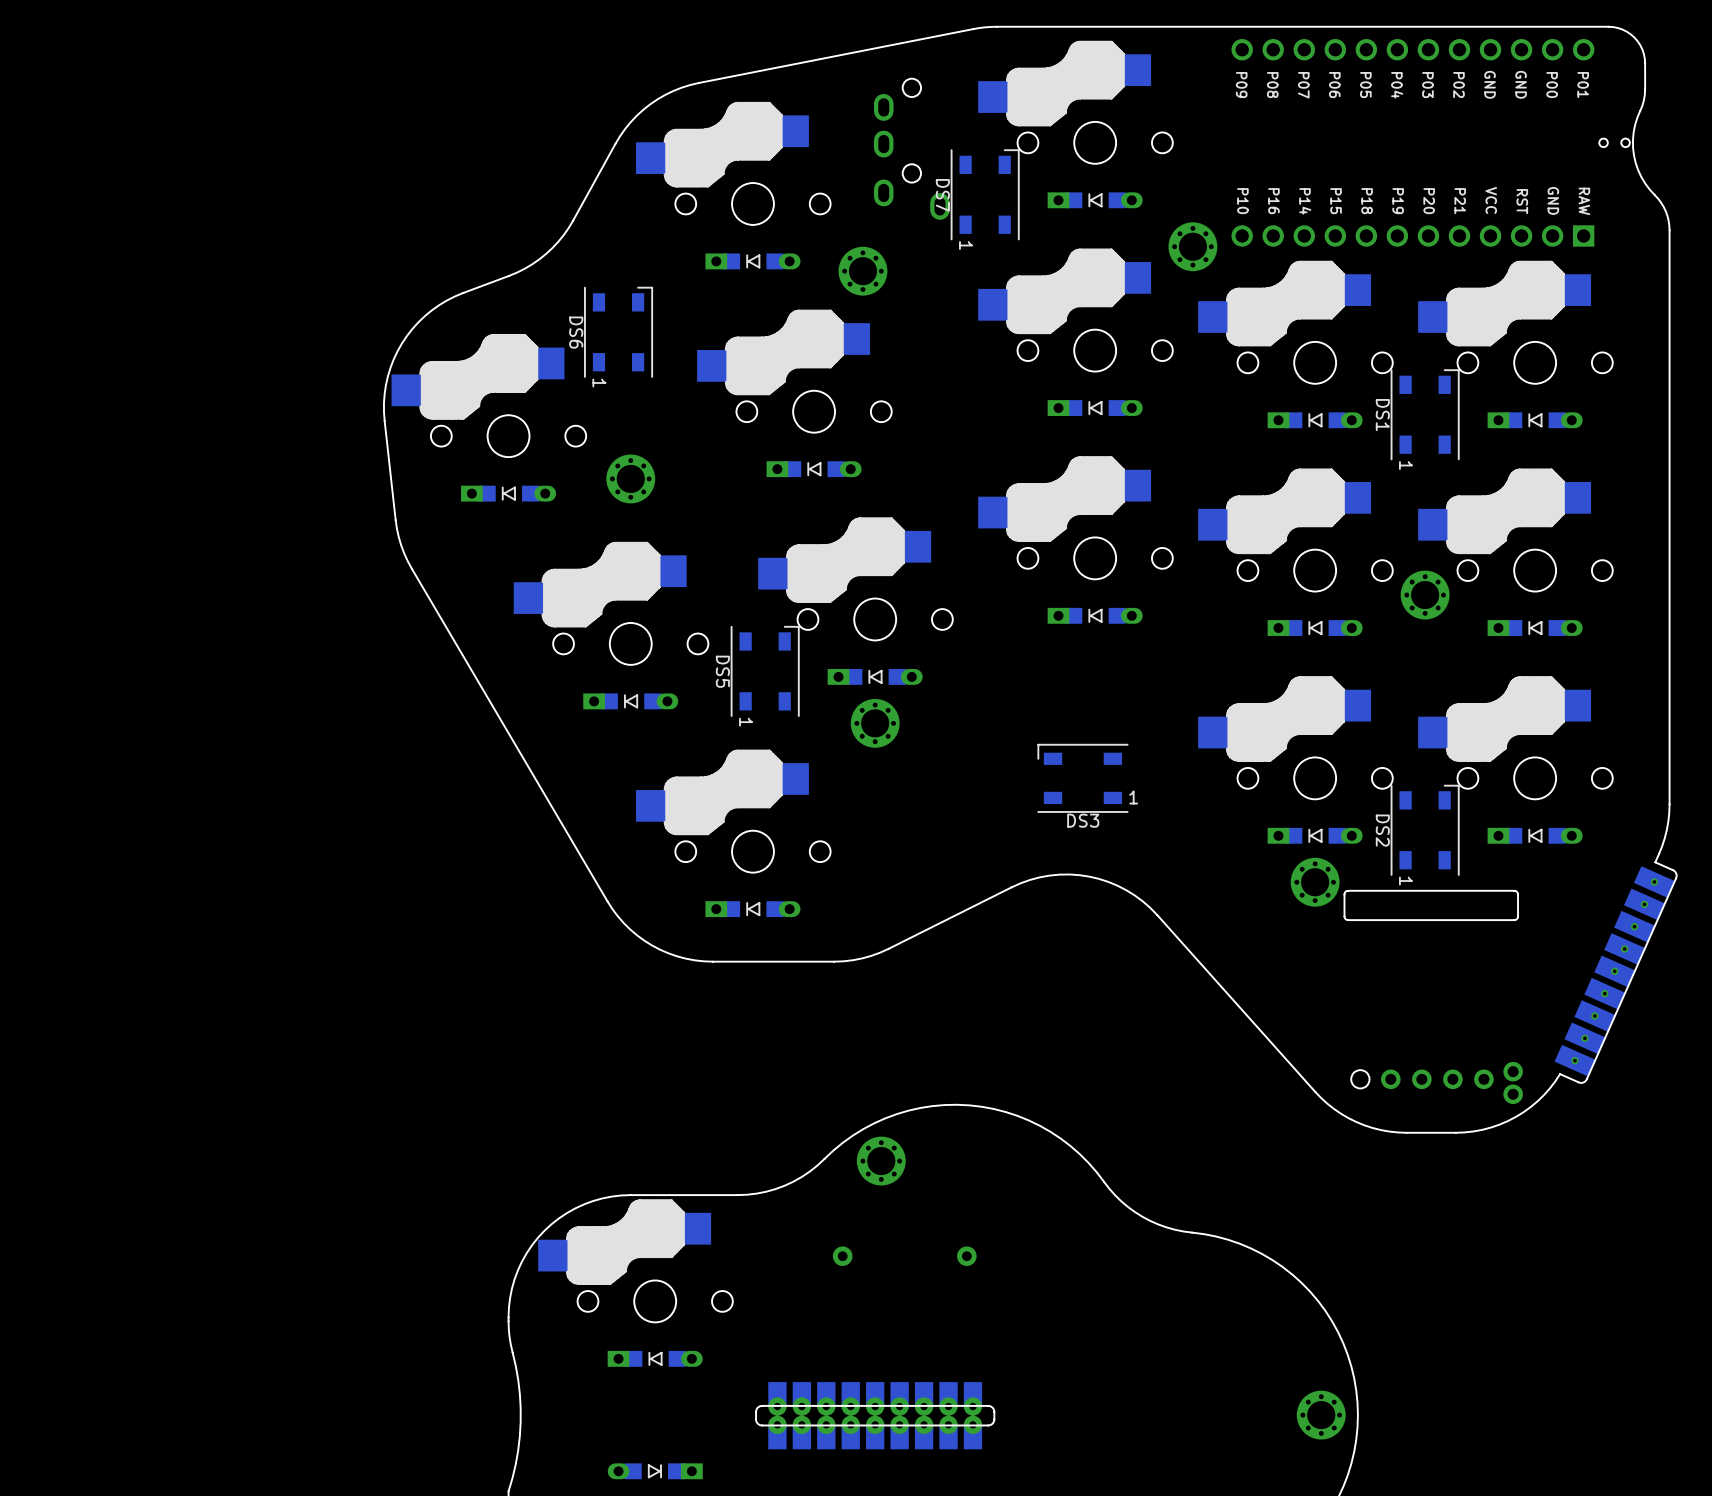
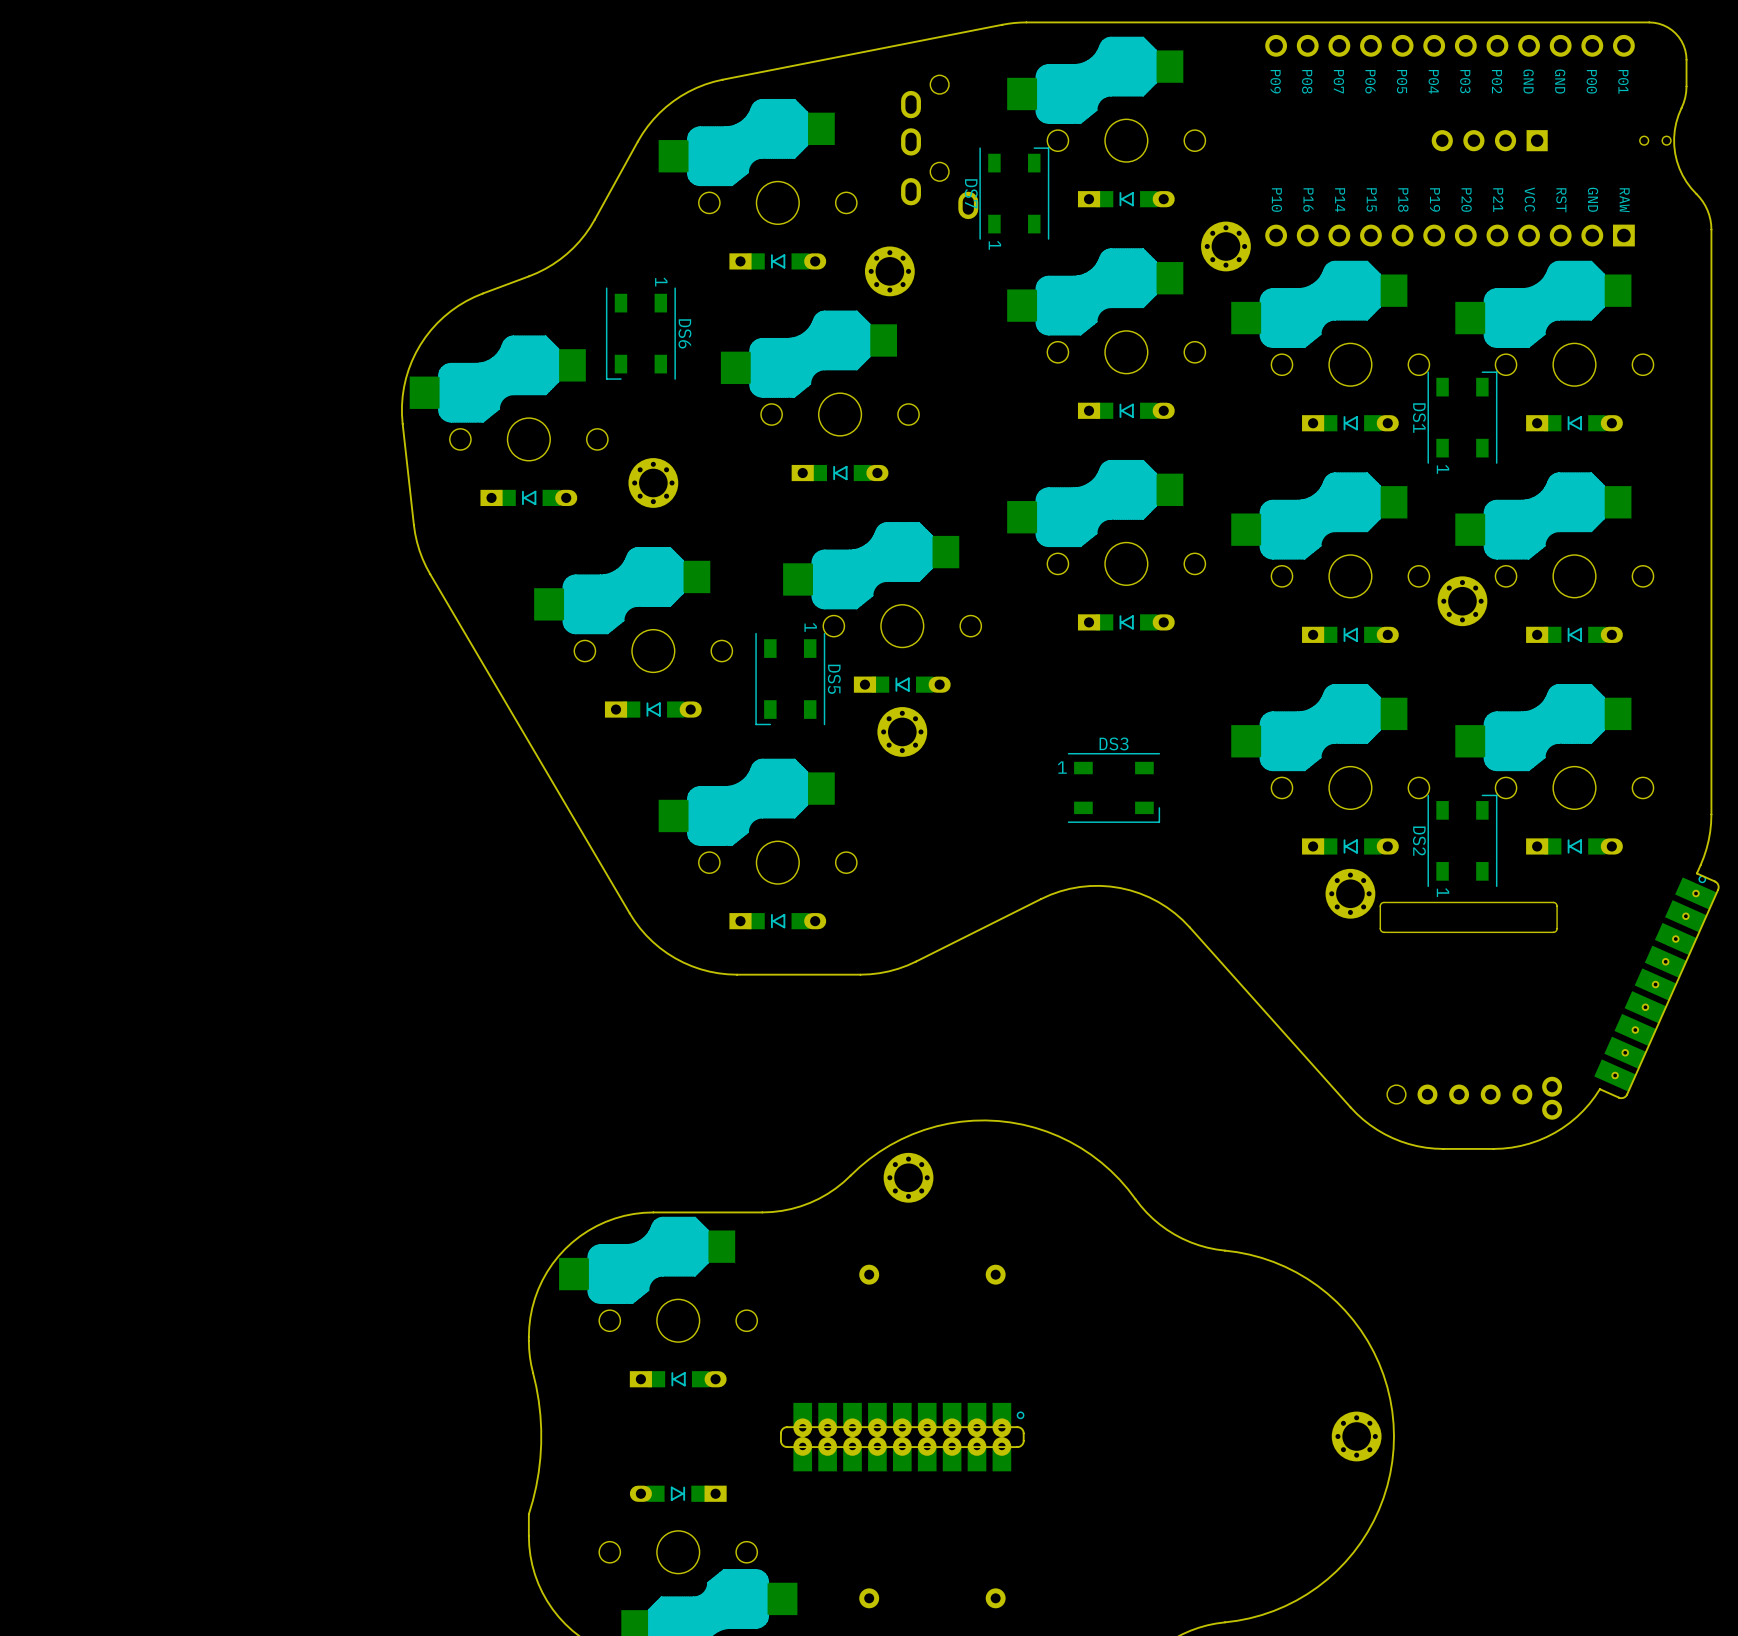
part: none -> (1489, 140)
DS6 rotation: 0° (618, 332) -> 180° (640, 333)
DS5 rotation: 0° (765, 671) -> 180° (790, 679)
DS3 rotation: 0° (1082, 778) -> 180° (1113, 787)
part footprint: [1554, 866, 1675, 1077] -> [1594, 875, 1717, 1092]
part footprint: [755, 1382, 996, 1450] -> [780, 1402, 1025, 1472]

